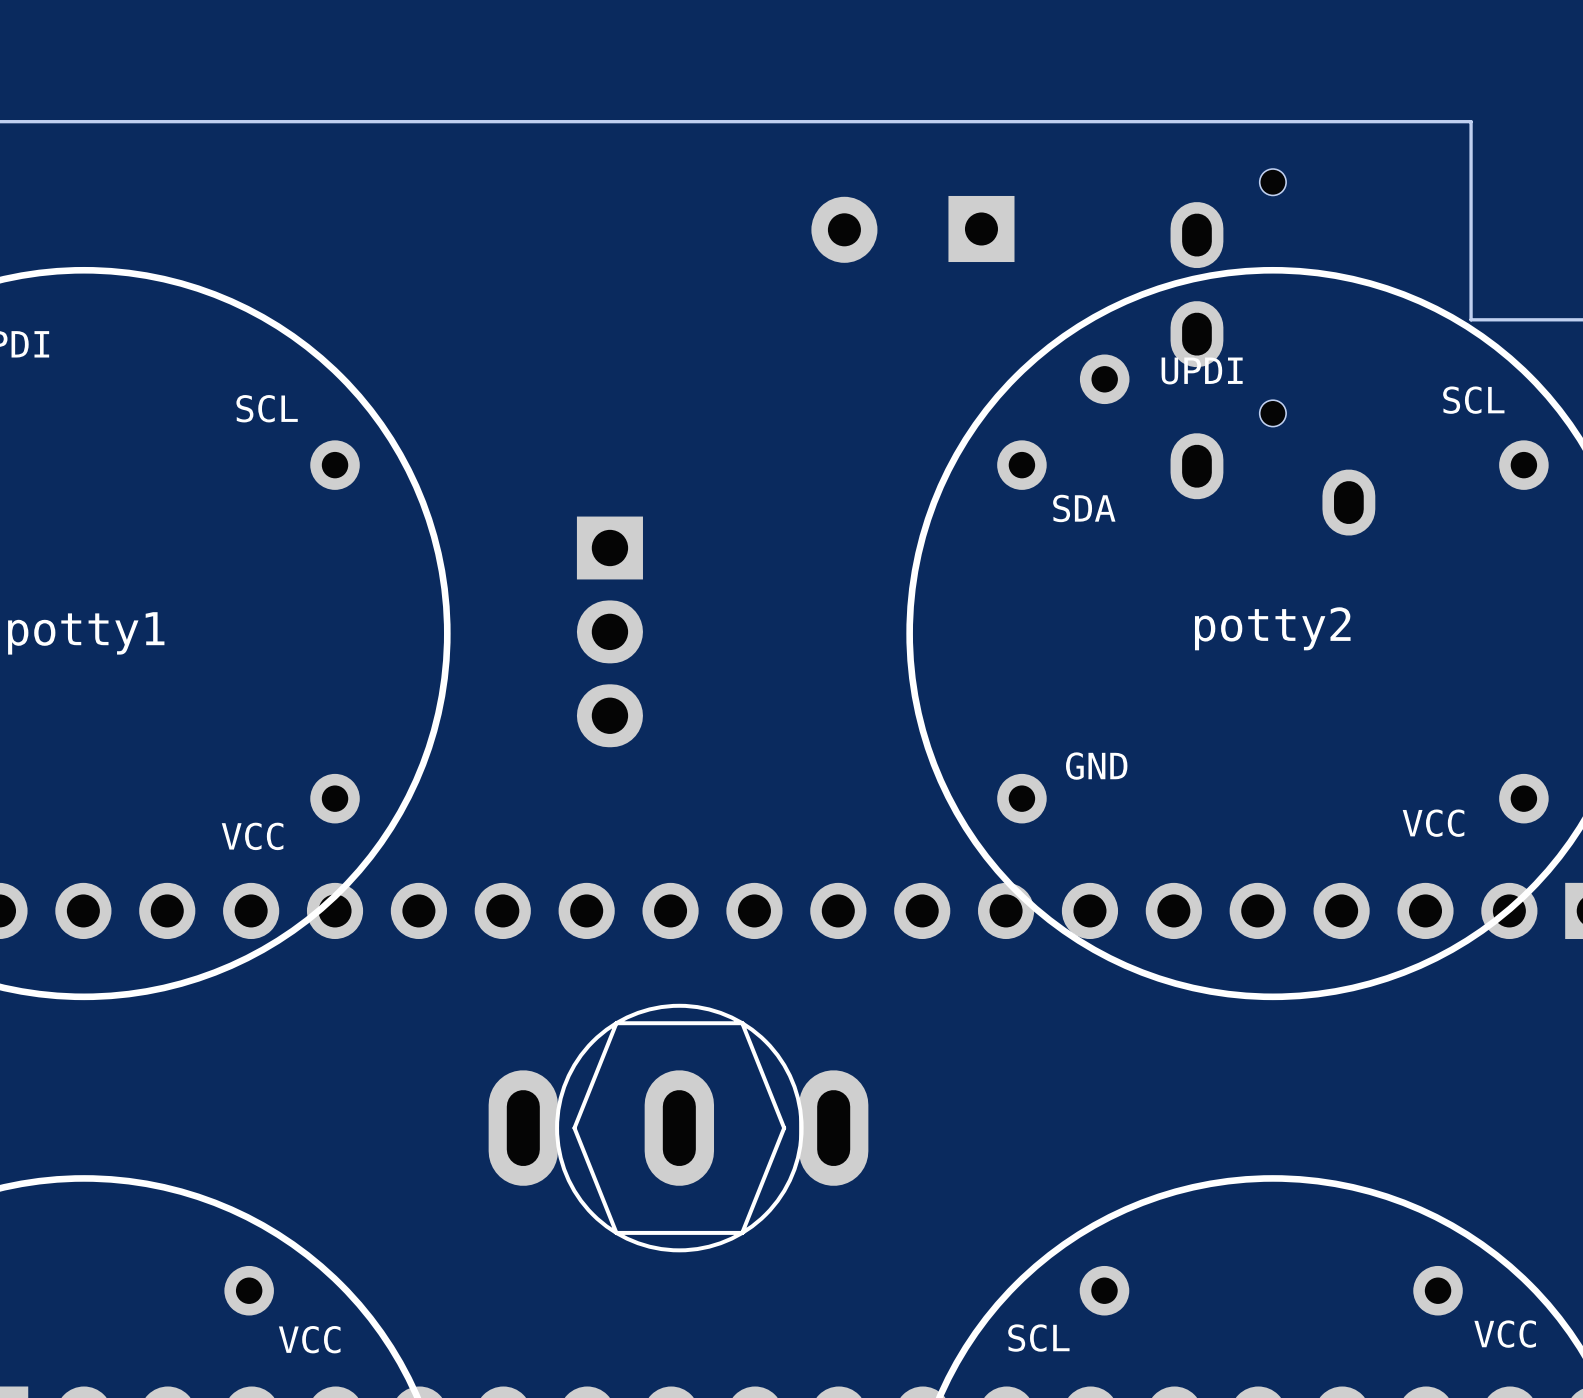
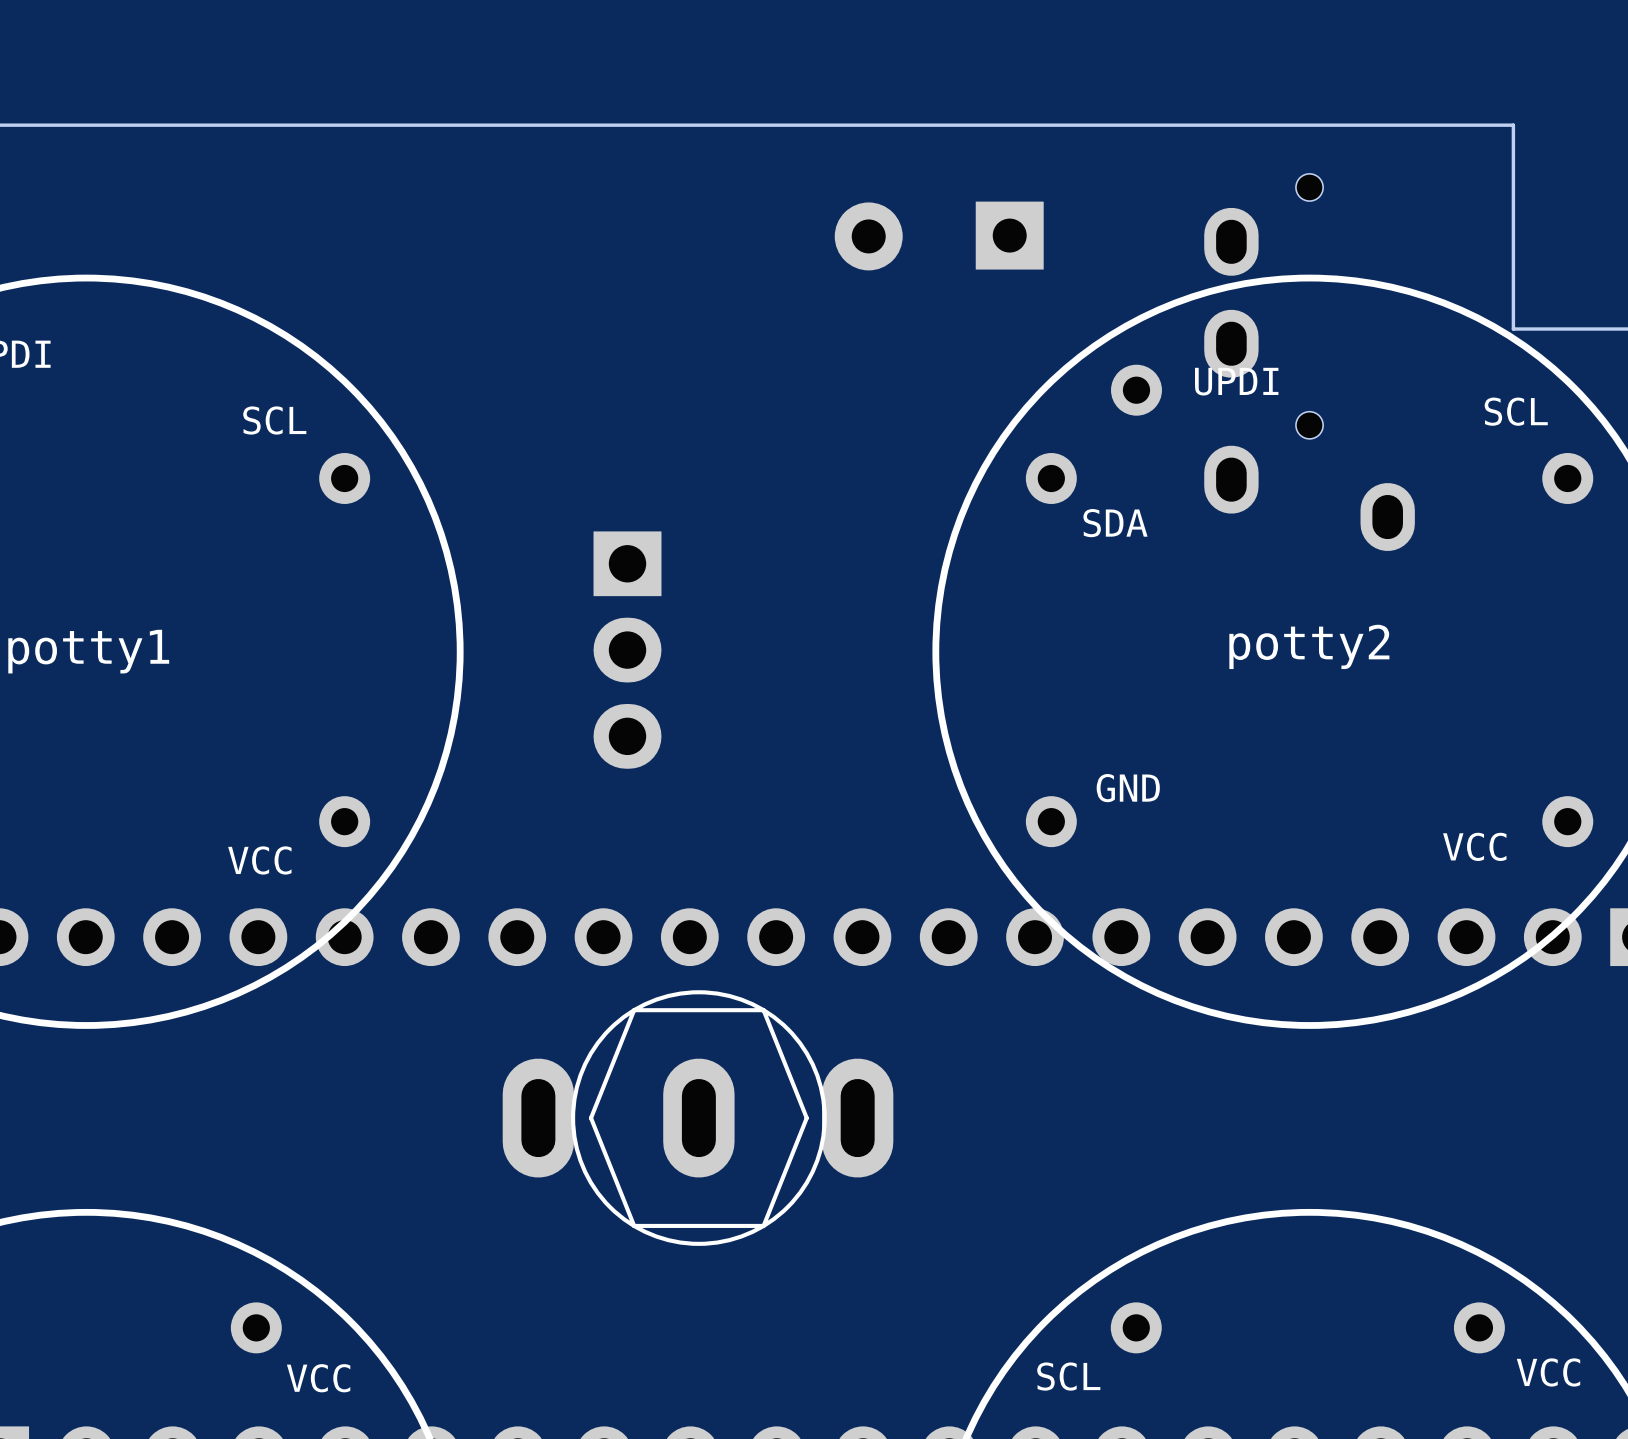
part position: (678, 1128) -> (698, 1118)

